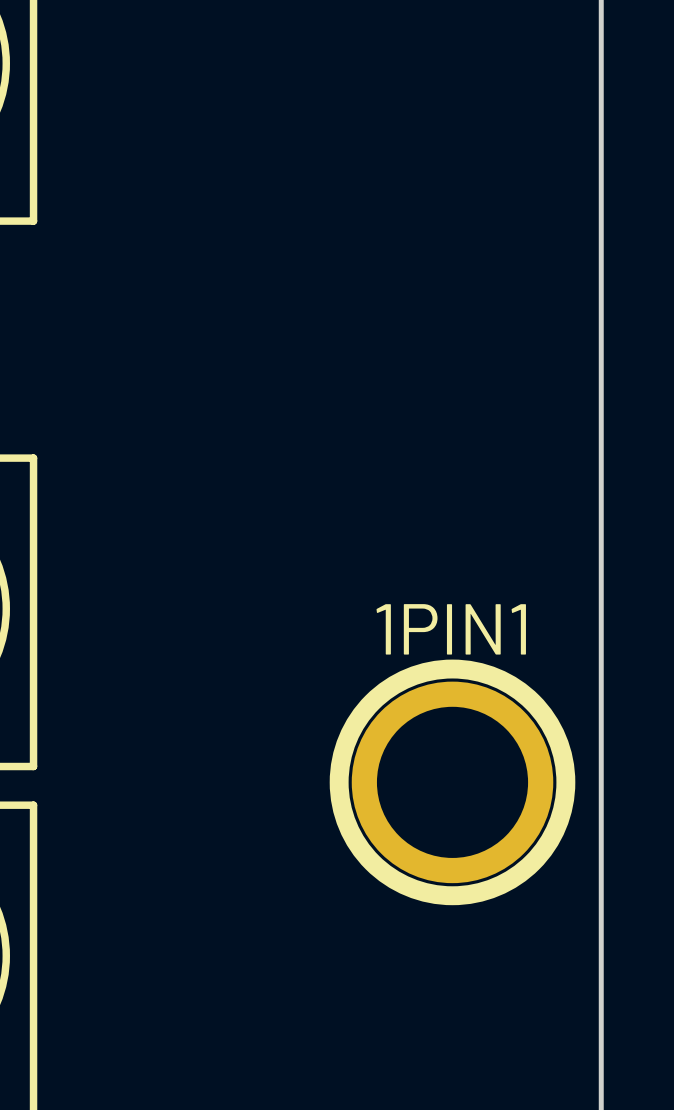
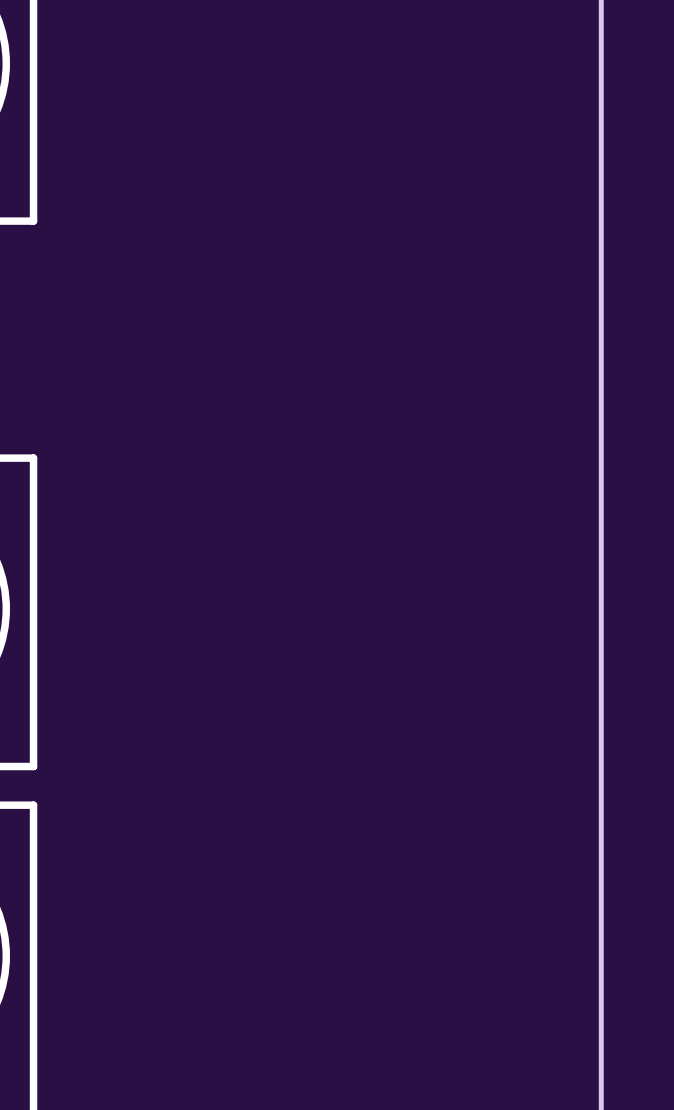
1PIN1: (452, 782) -> none

